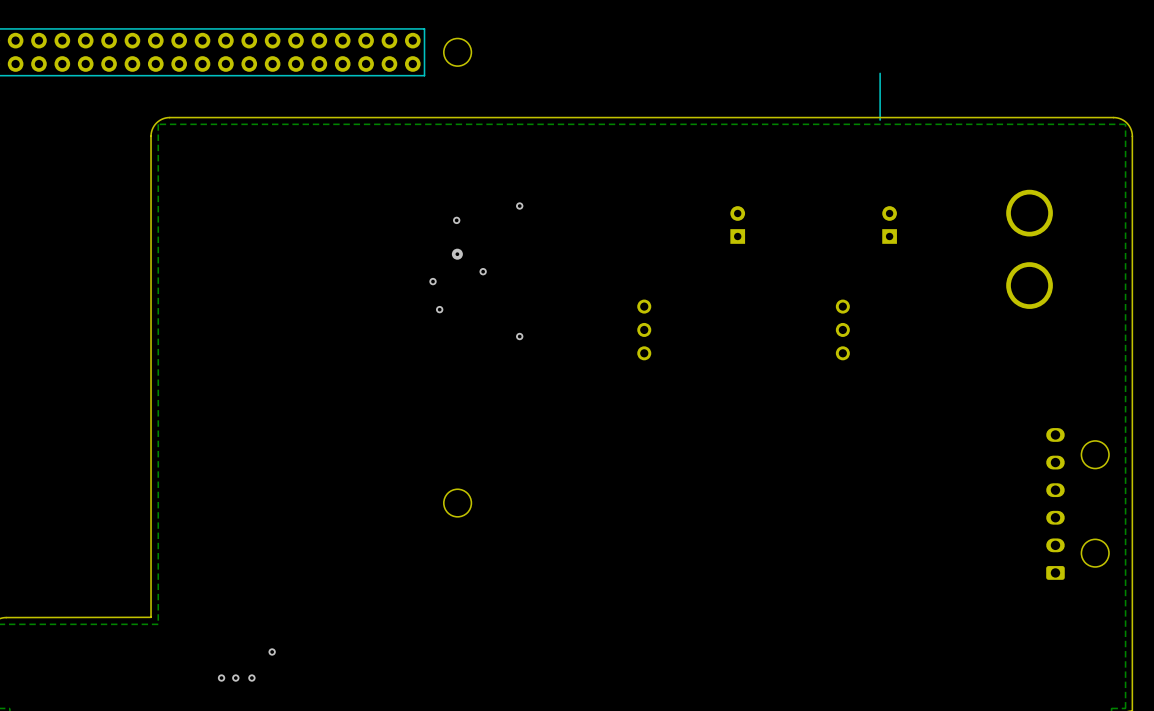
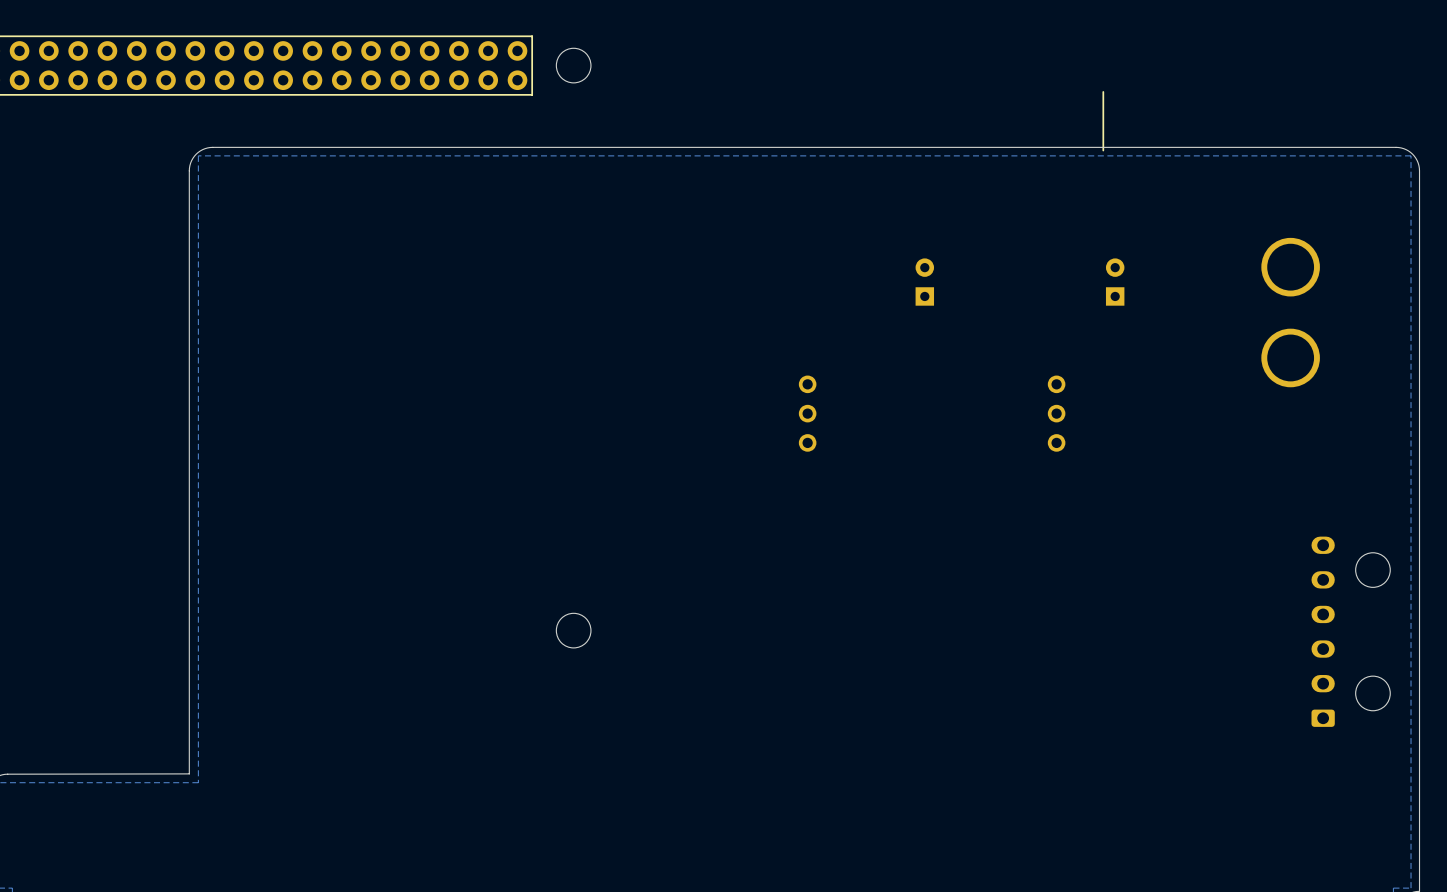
via: (519, 206) -> none
via: (456, 220) -> none
via: (457, 254) -> none
via: (483, 271) -> none
via: (433, 281) -> none
via: (439, 309) -> none
via: (519, 336) -> none
via: (272, 651) -> none
via: (221, 678) -> none
via: (235, 678) -> none
via: (251, 678) -> none

